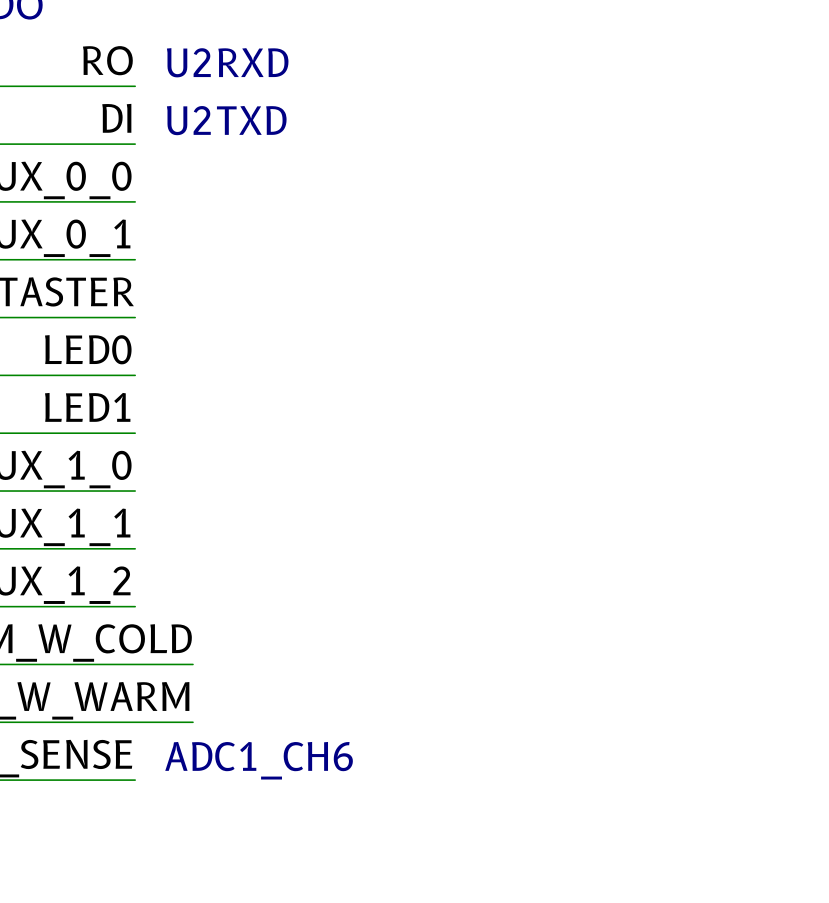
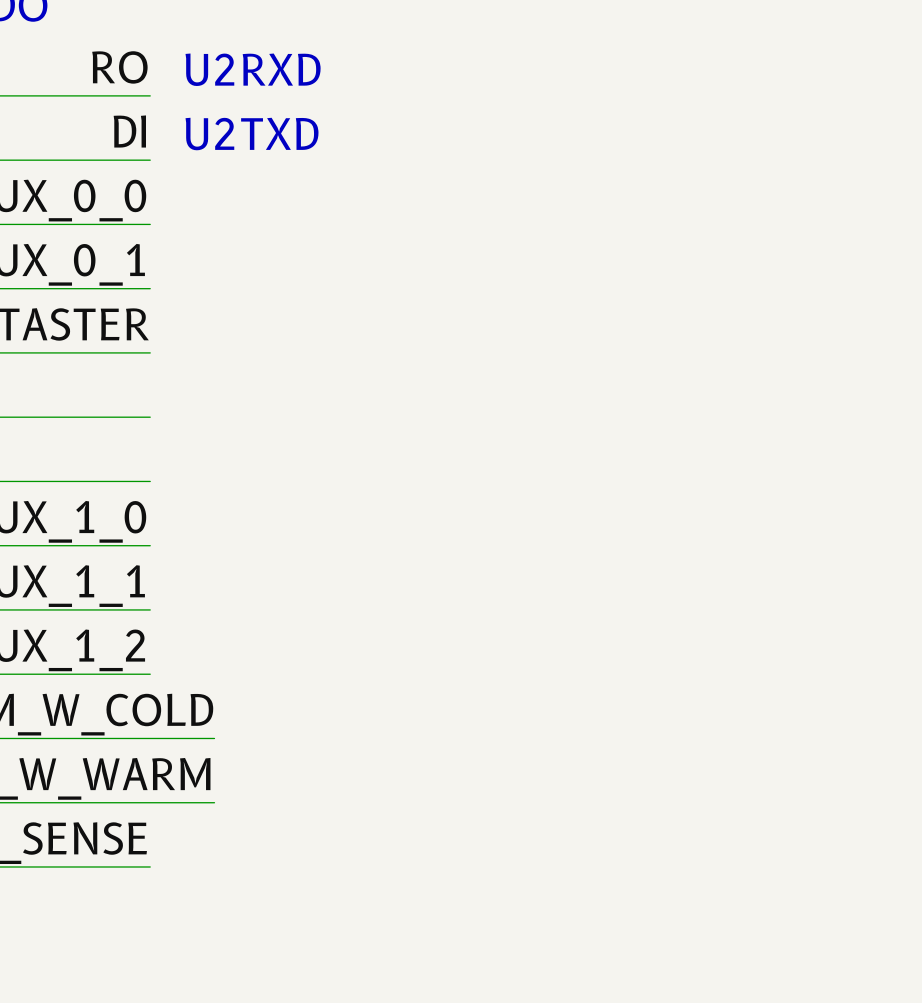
label: LED0 (88, 349) -> none
label: LED1 (87, 407) -> none
text: ADC1_CH6 (259, 760) -> none

